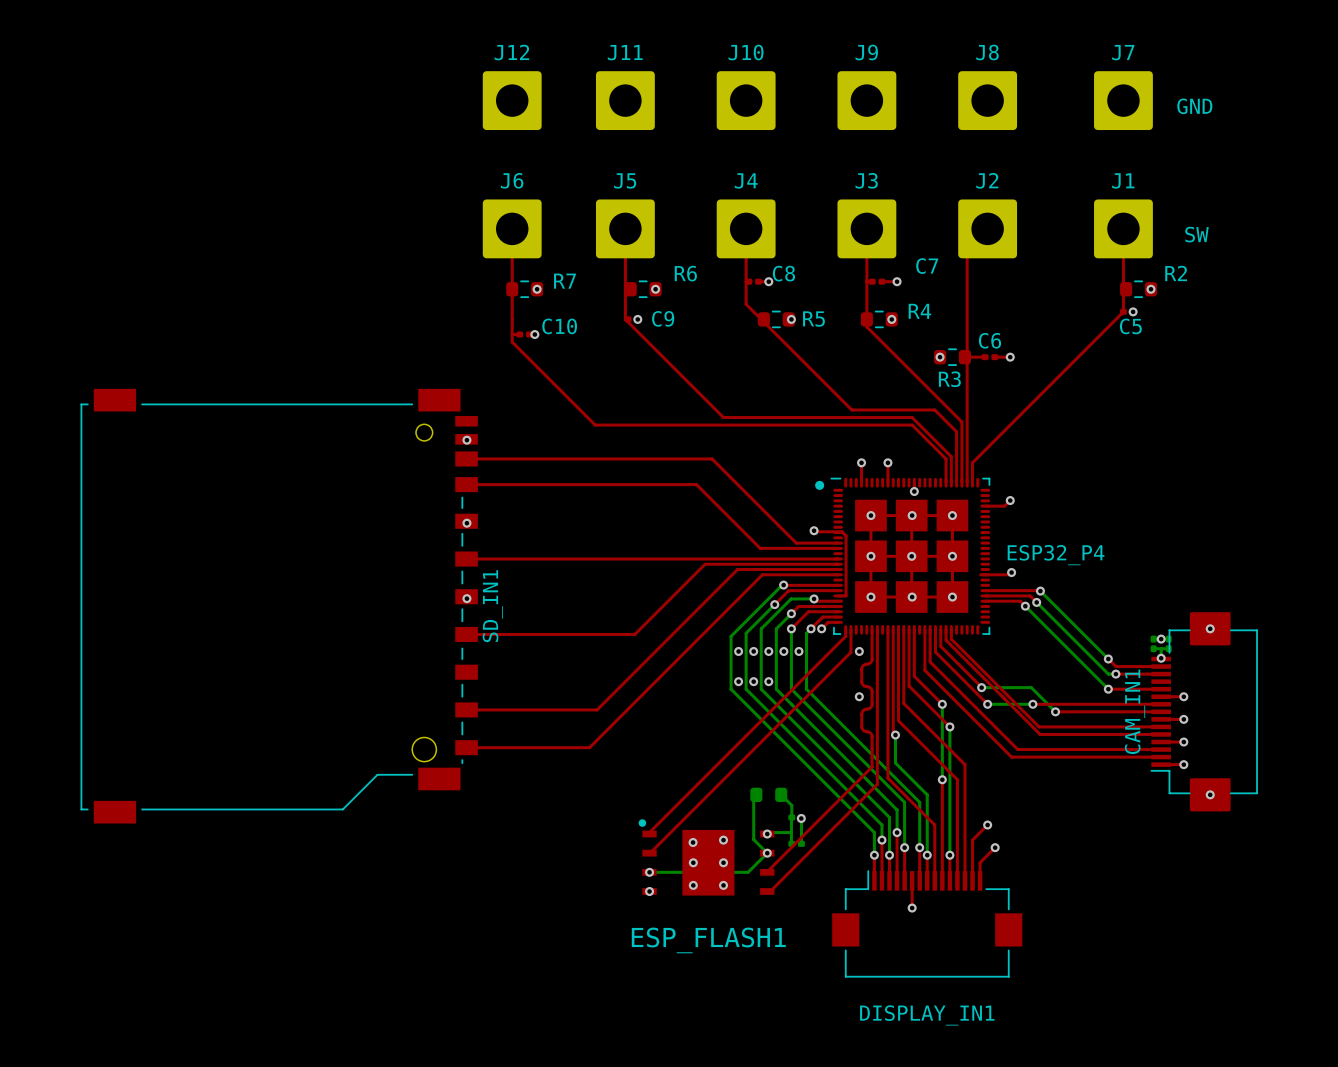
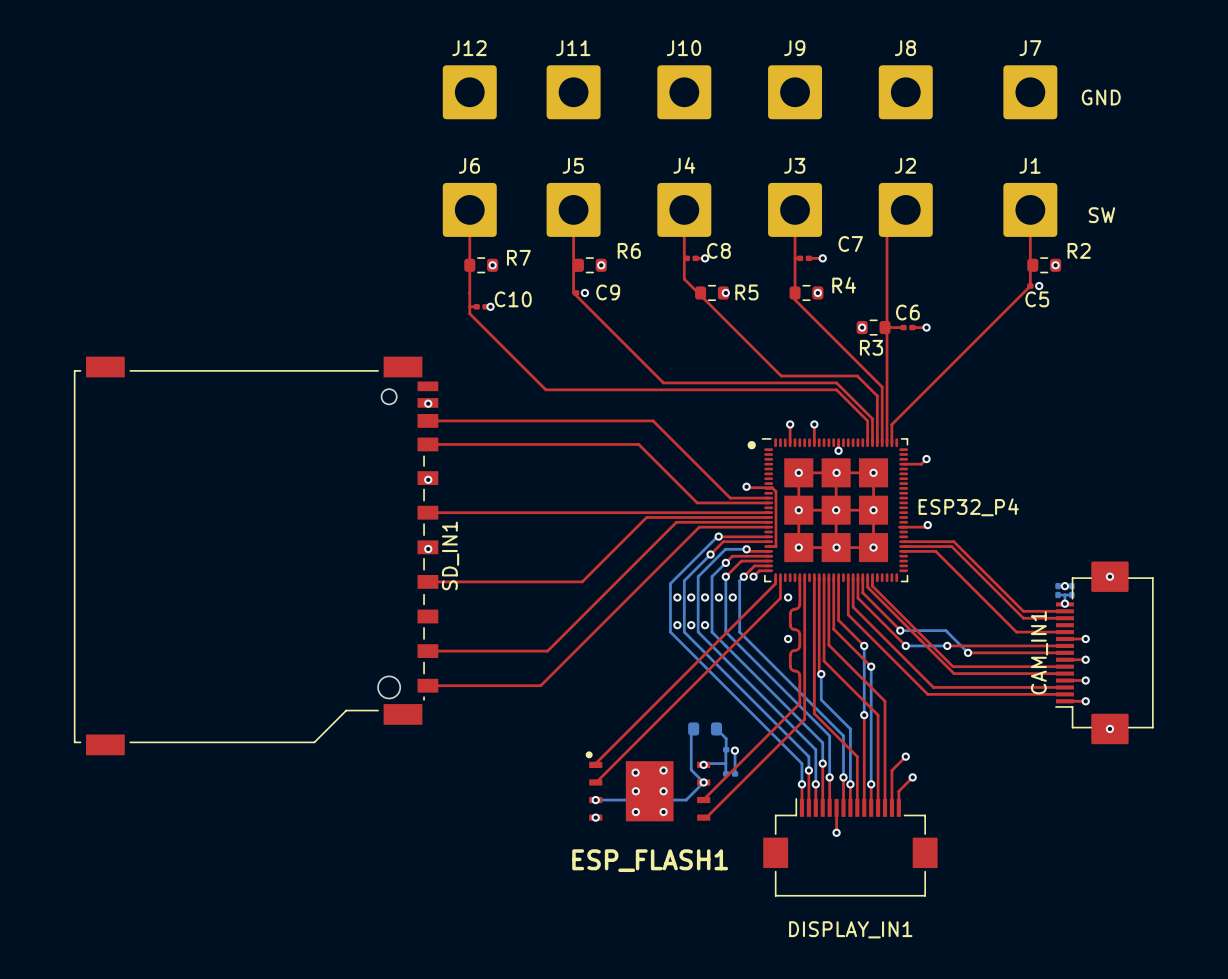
top track: none -> (954, 542) (1016, 604)
bottom track: (1040, 591) (1108, 659) -> none
via: (1040, 591) -> none
top track: (1030, 595) (1036, 602) -> (944, 546) (951, 546) (1023, 618)
bottom track: (1036, 602) (1108, 674) (1115, 674) -> none
via: (1036, 602) -> none
top track: none -> (940, 555) (1016, 632)
bottom track: (1025, 606) (1108, 689) -> none
via: (1025, 606) -> none
via: (1108, 659) -> none
via: (1115, 674) -> none
via: (1108, 689) -> none

